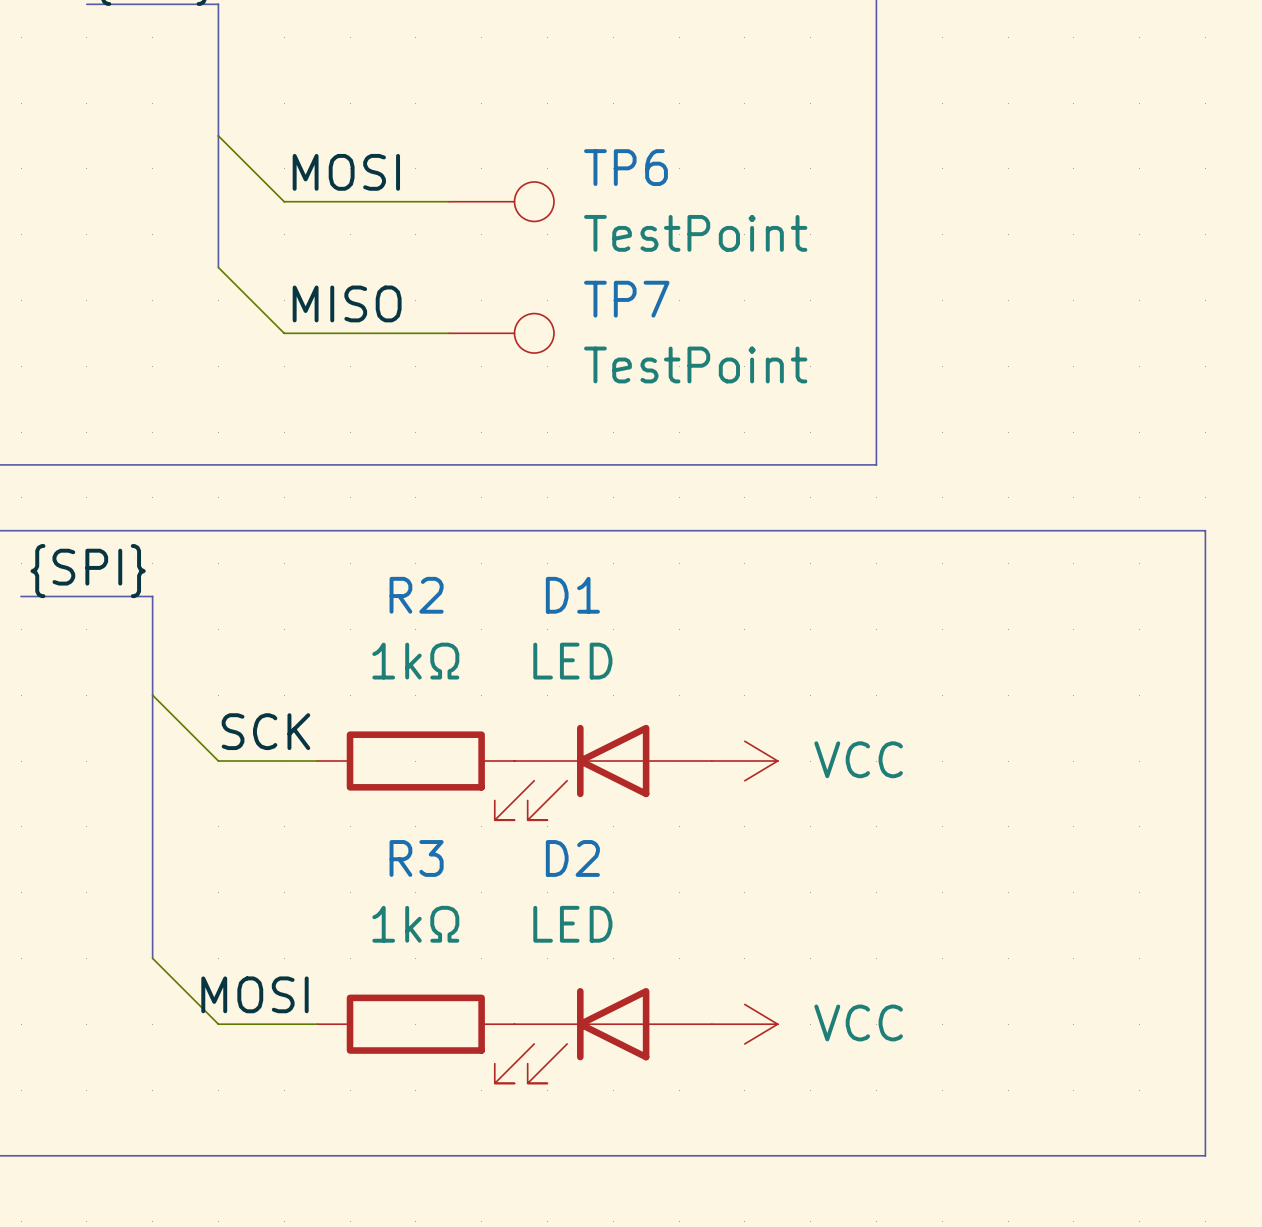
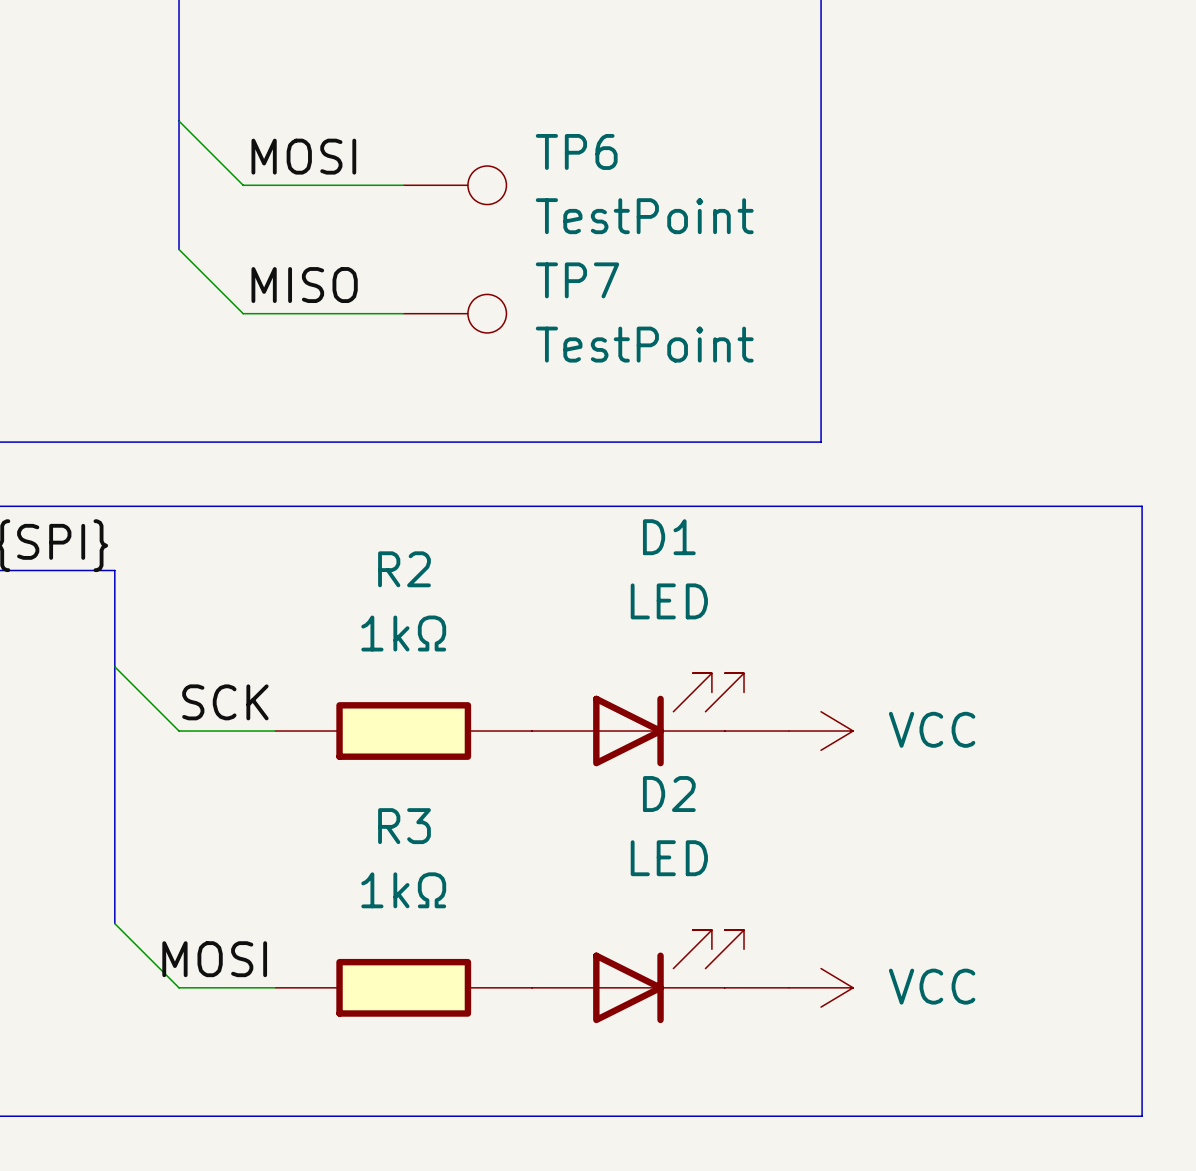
D1 name position: D1 (572, 595) -> D1 (669, 537)
D1 value position: LED (572, 661) -> LED (669, 601)
R2 symbol: [317, 731, 515, 791] -> [275, 702, 533, 760]
power symbol: VCC (744, 761) -> none
power symbol: none -> VCC (788, 731)
D1 rotation: 0° (572, 772) -> 180° (668, 719)
D2 name position: D2 (572, 858) -> D2 (669, 794)
D2 value position: LED (572, 924) -> LED (669, 858)
R3 symbol: [317, 994, 515, 1054] -> [275, 958, 533, 1017]
power symbol: VCC (744, 1024) -> none
power symbol: none -> VCC (788, 987)
D2 rotation: 0° (572, 1035) -> 180° (668, 976)

